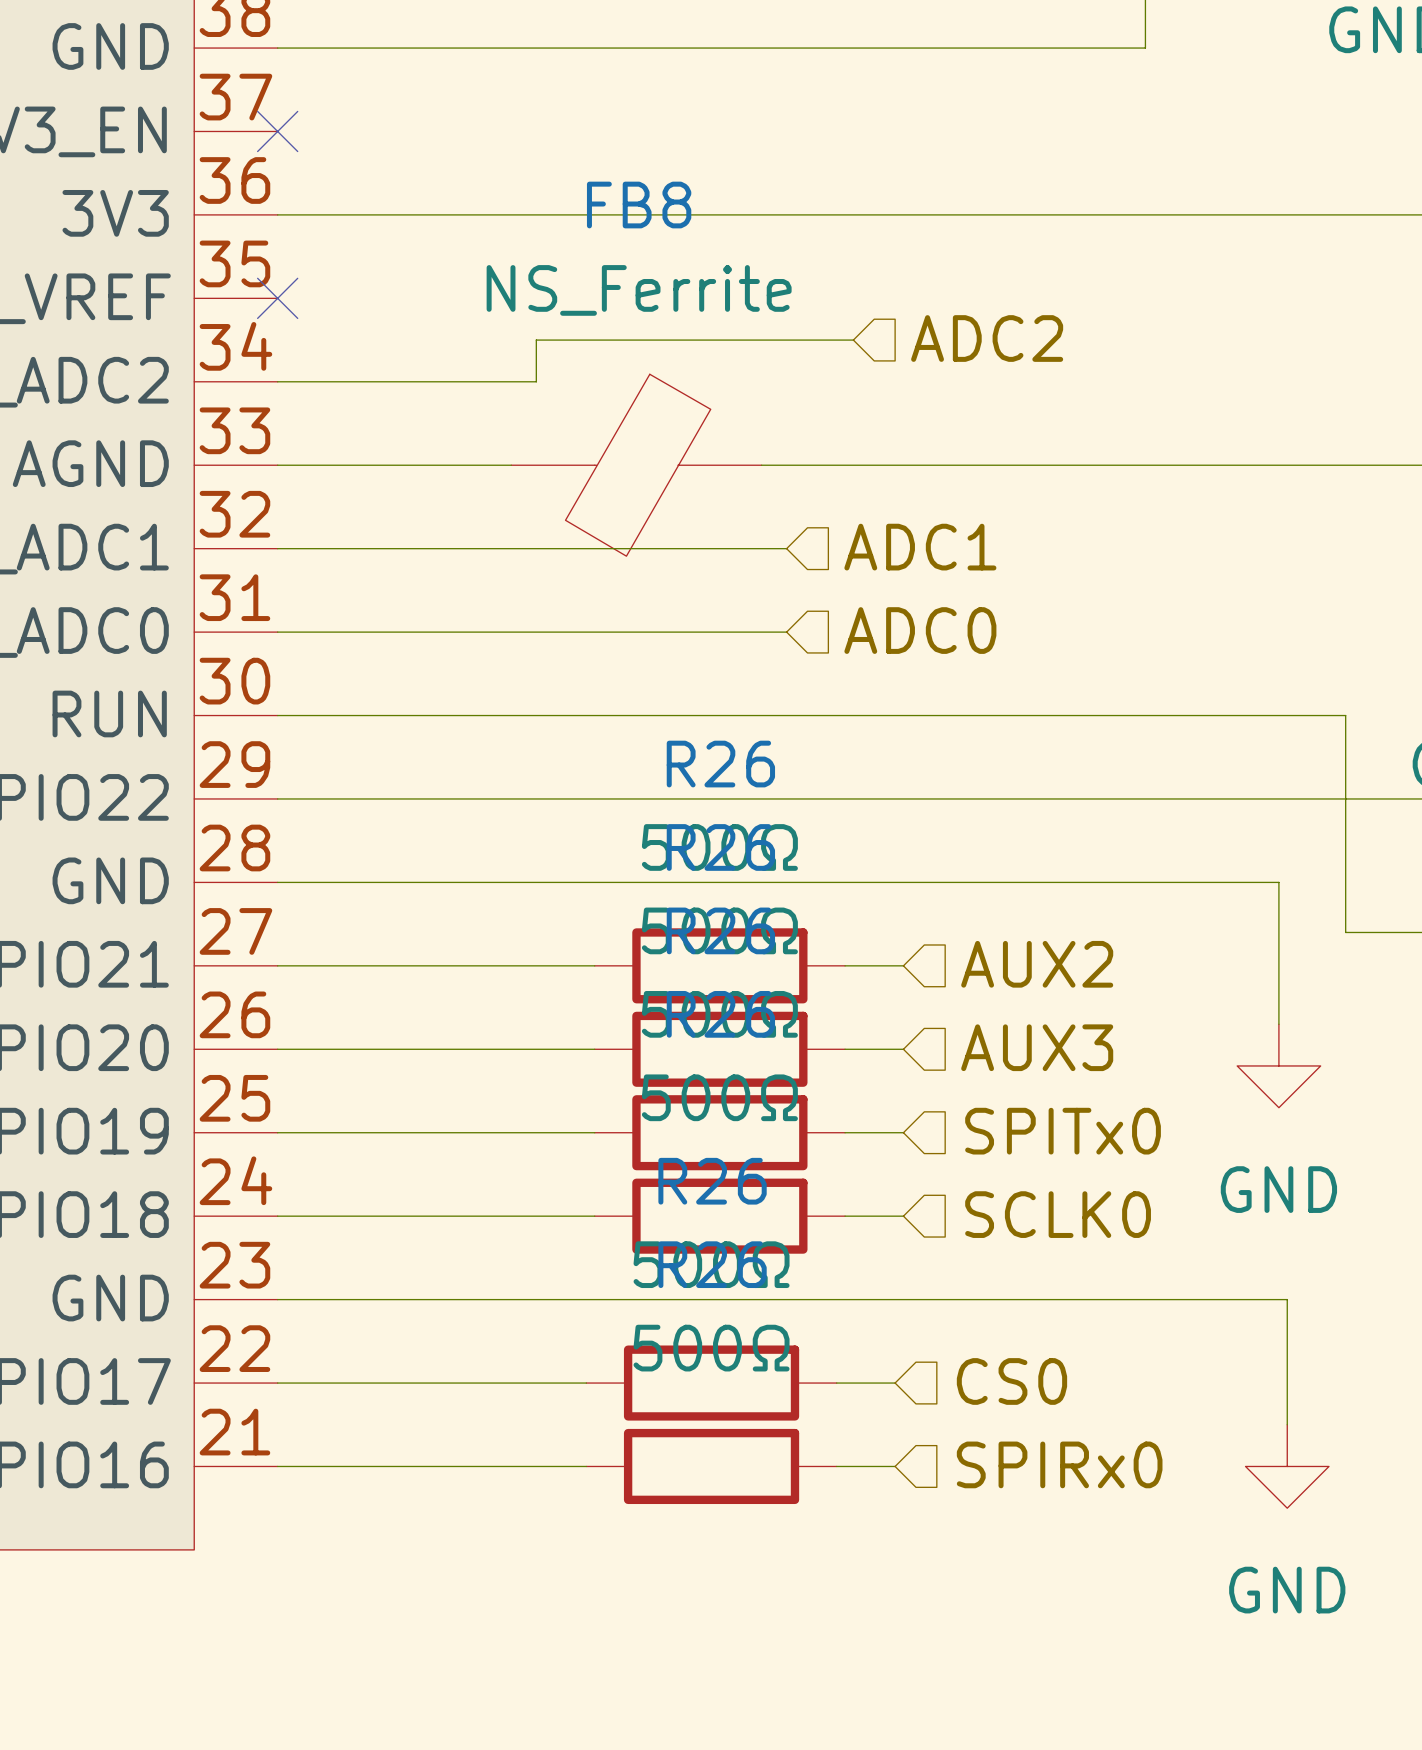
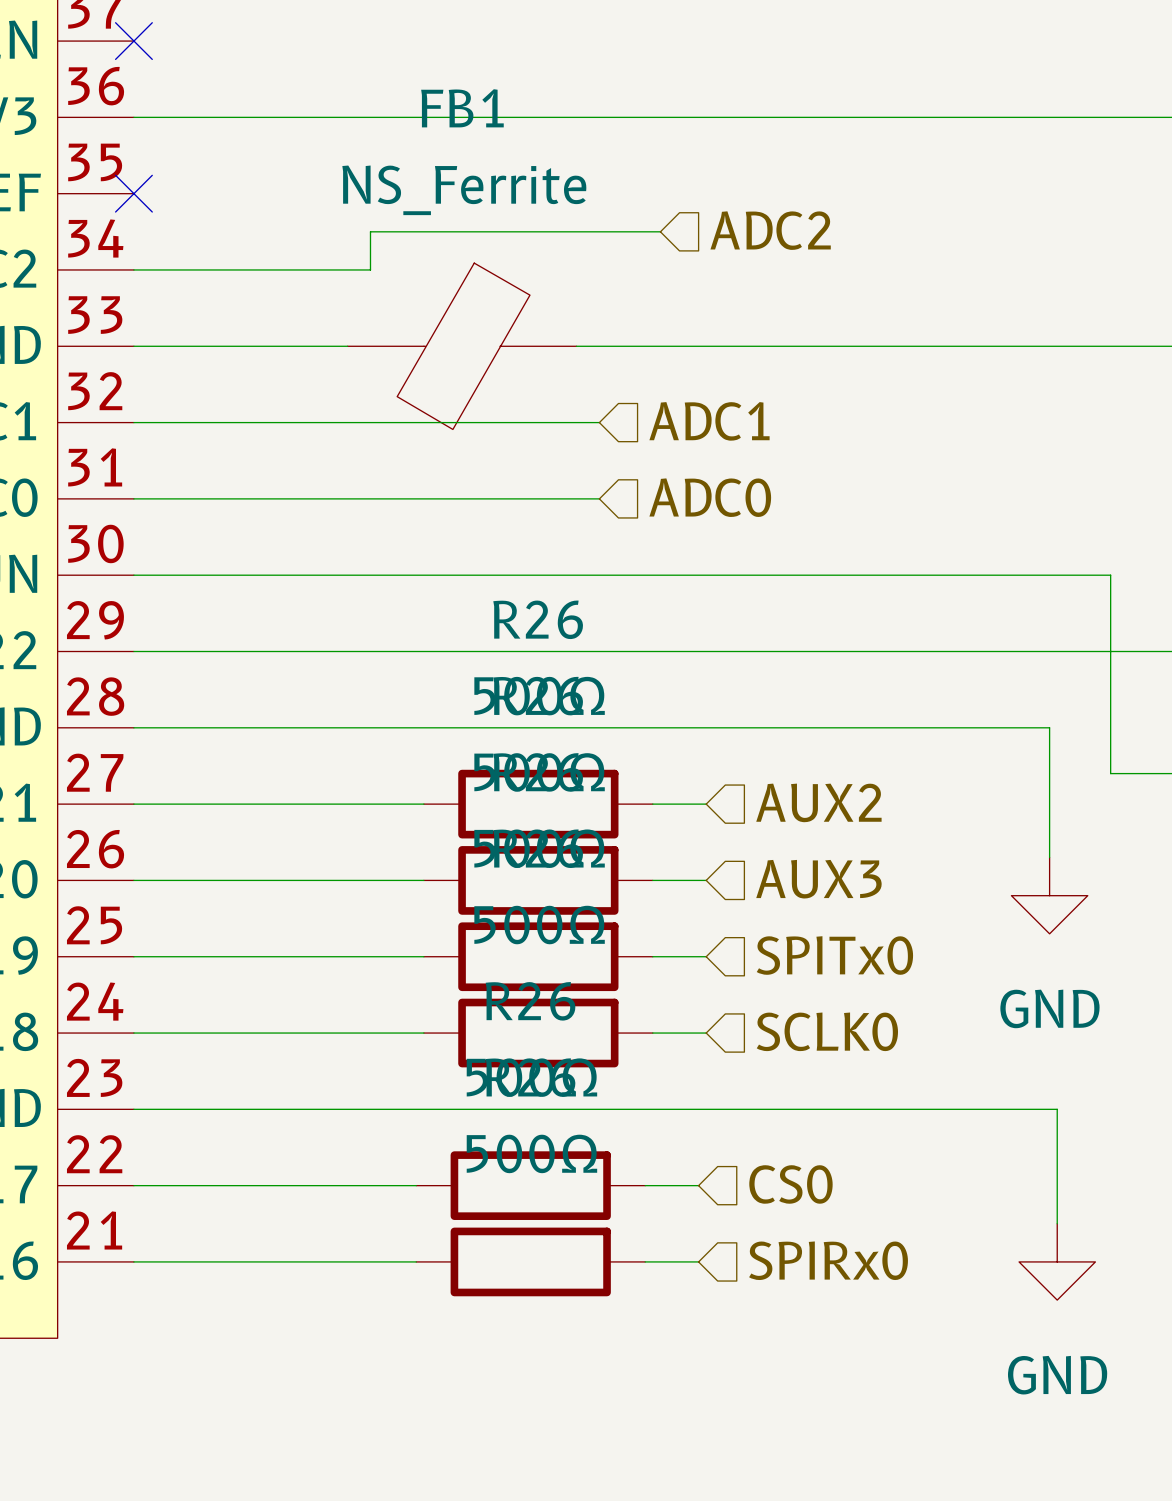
FB8 name: FB8 (639, 205) -> FB1 (462, 108)

